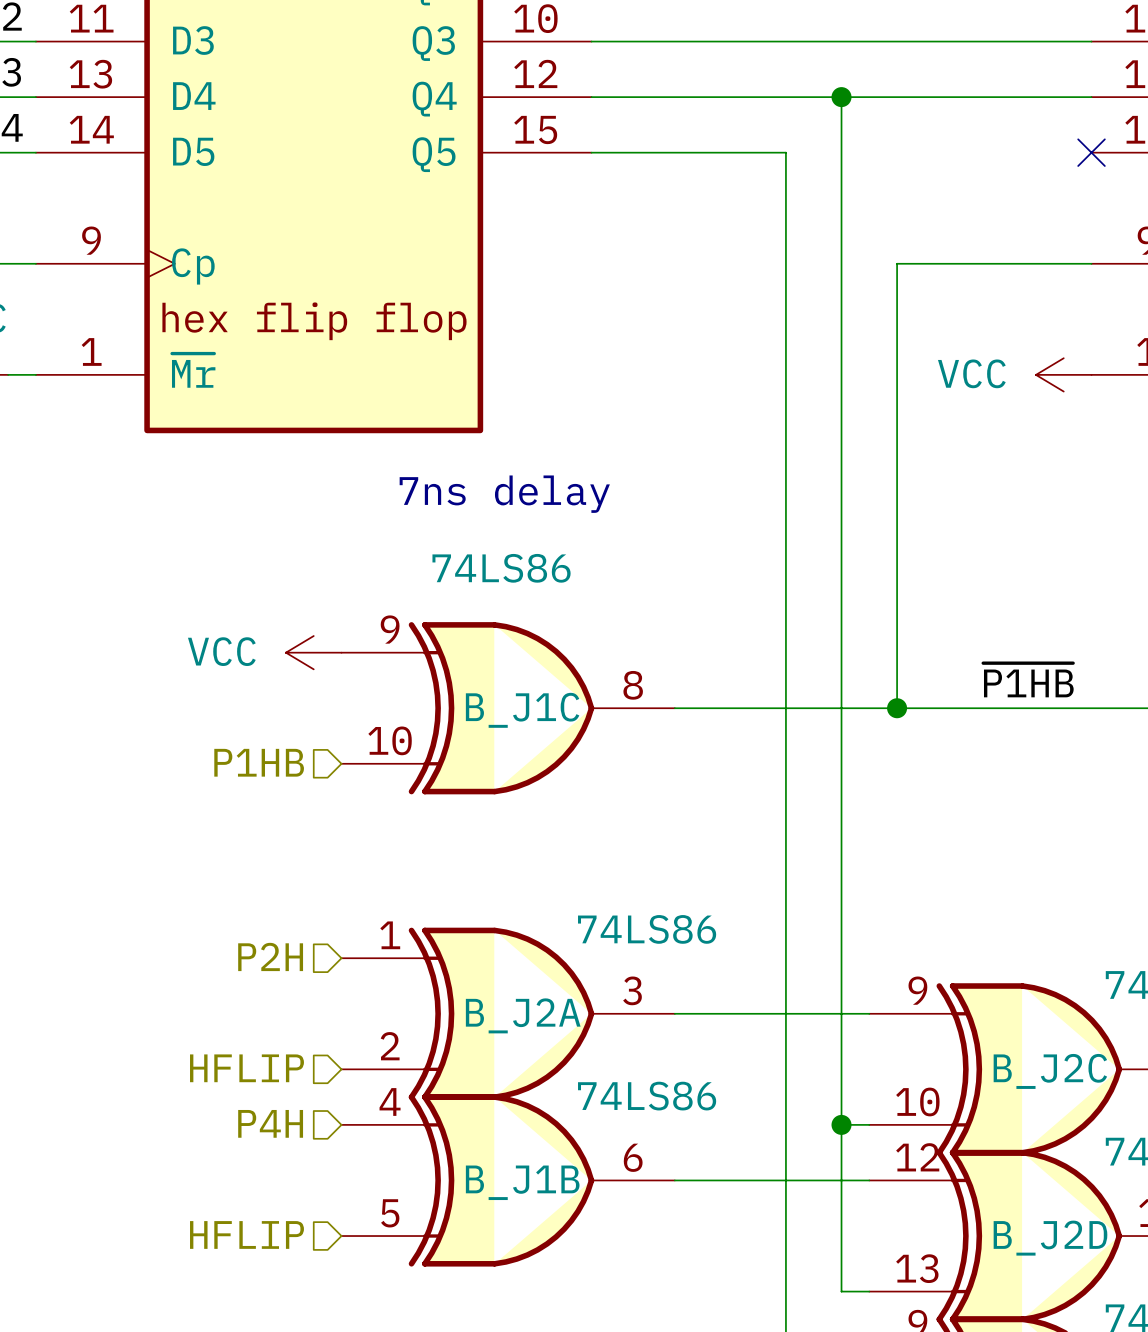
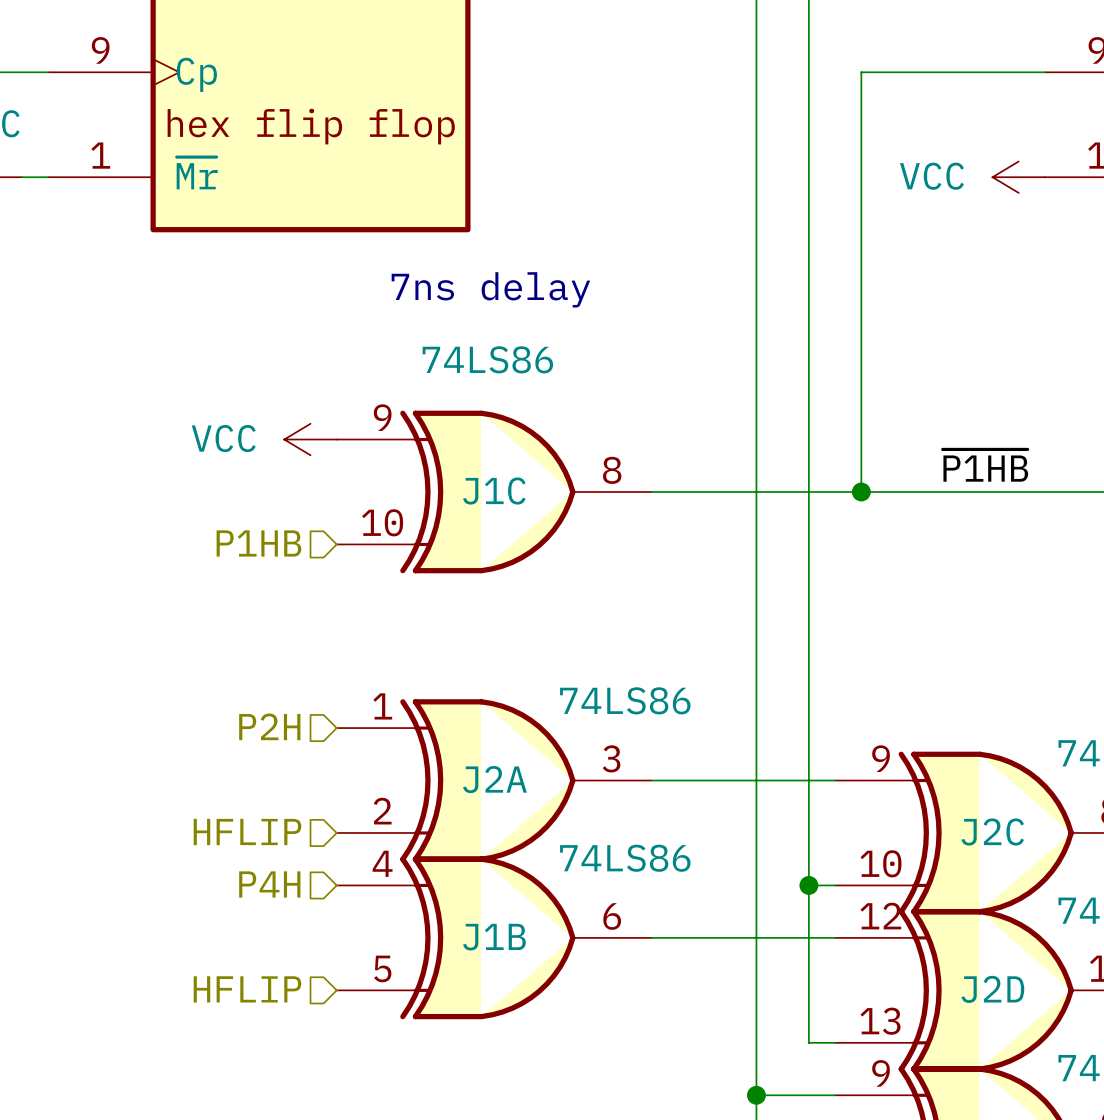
B_J1C name: B_J1C (522, 710) -> J1C (494, 491)
B_J2A name: B_J2A (523, 1015) -> J2A (494, 779)
B_J2C name: B_J2C (1050, 1071) -> J2C (992, 832)
B_J1B name: B_J1B (522, 1182) -> J1B (494, 937)
B_J2D name: B_J2D (1050, 1238) -> J2D (992, 989)

